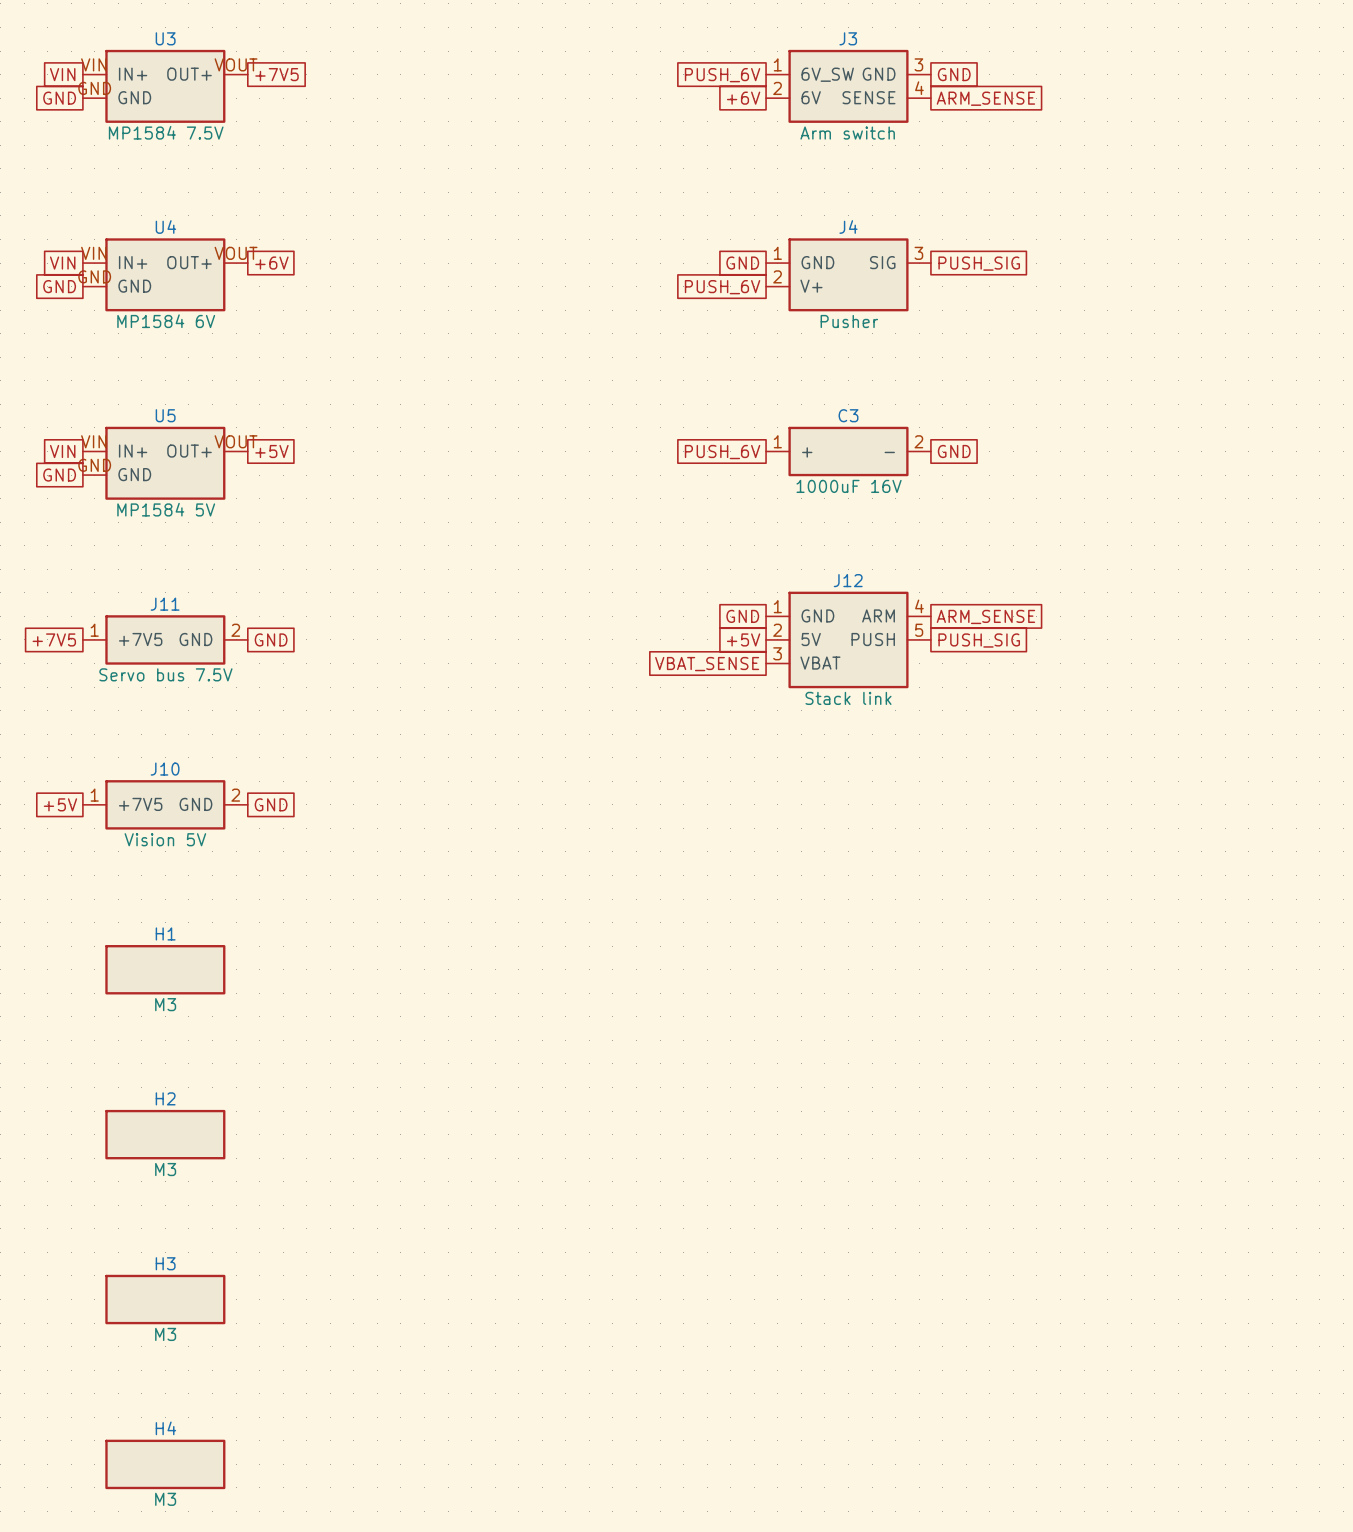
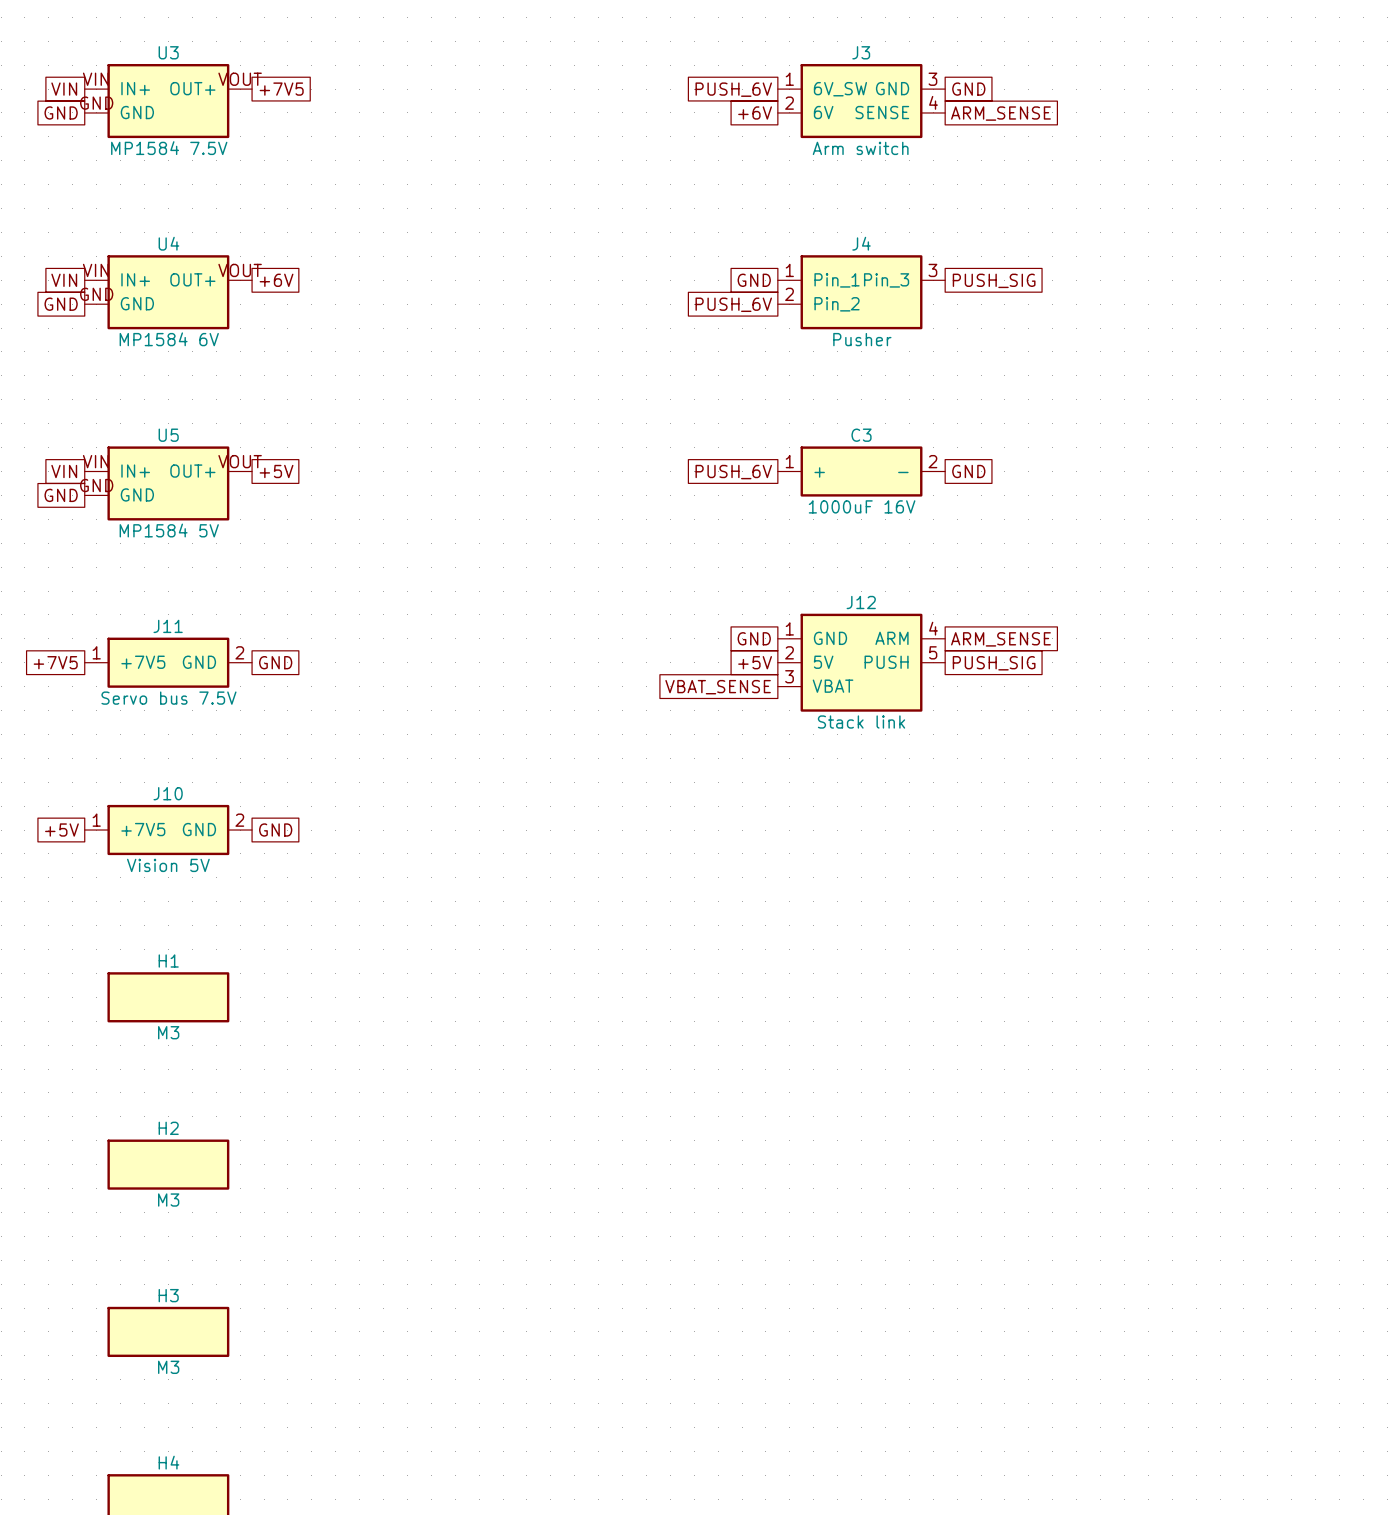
J4 pin name: GND (817, 262) -> Pin_1 (837, 280)
J4 pin name: SIG (882, 262) -> Pin_3 (886, 280)
J4 pin name: V+ (811, 286) -> Pin_2 (837, 304)

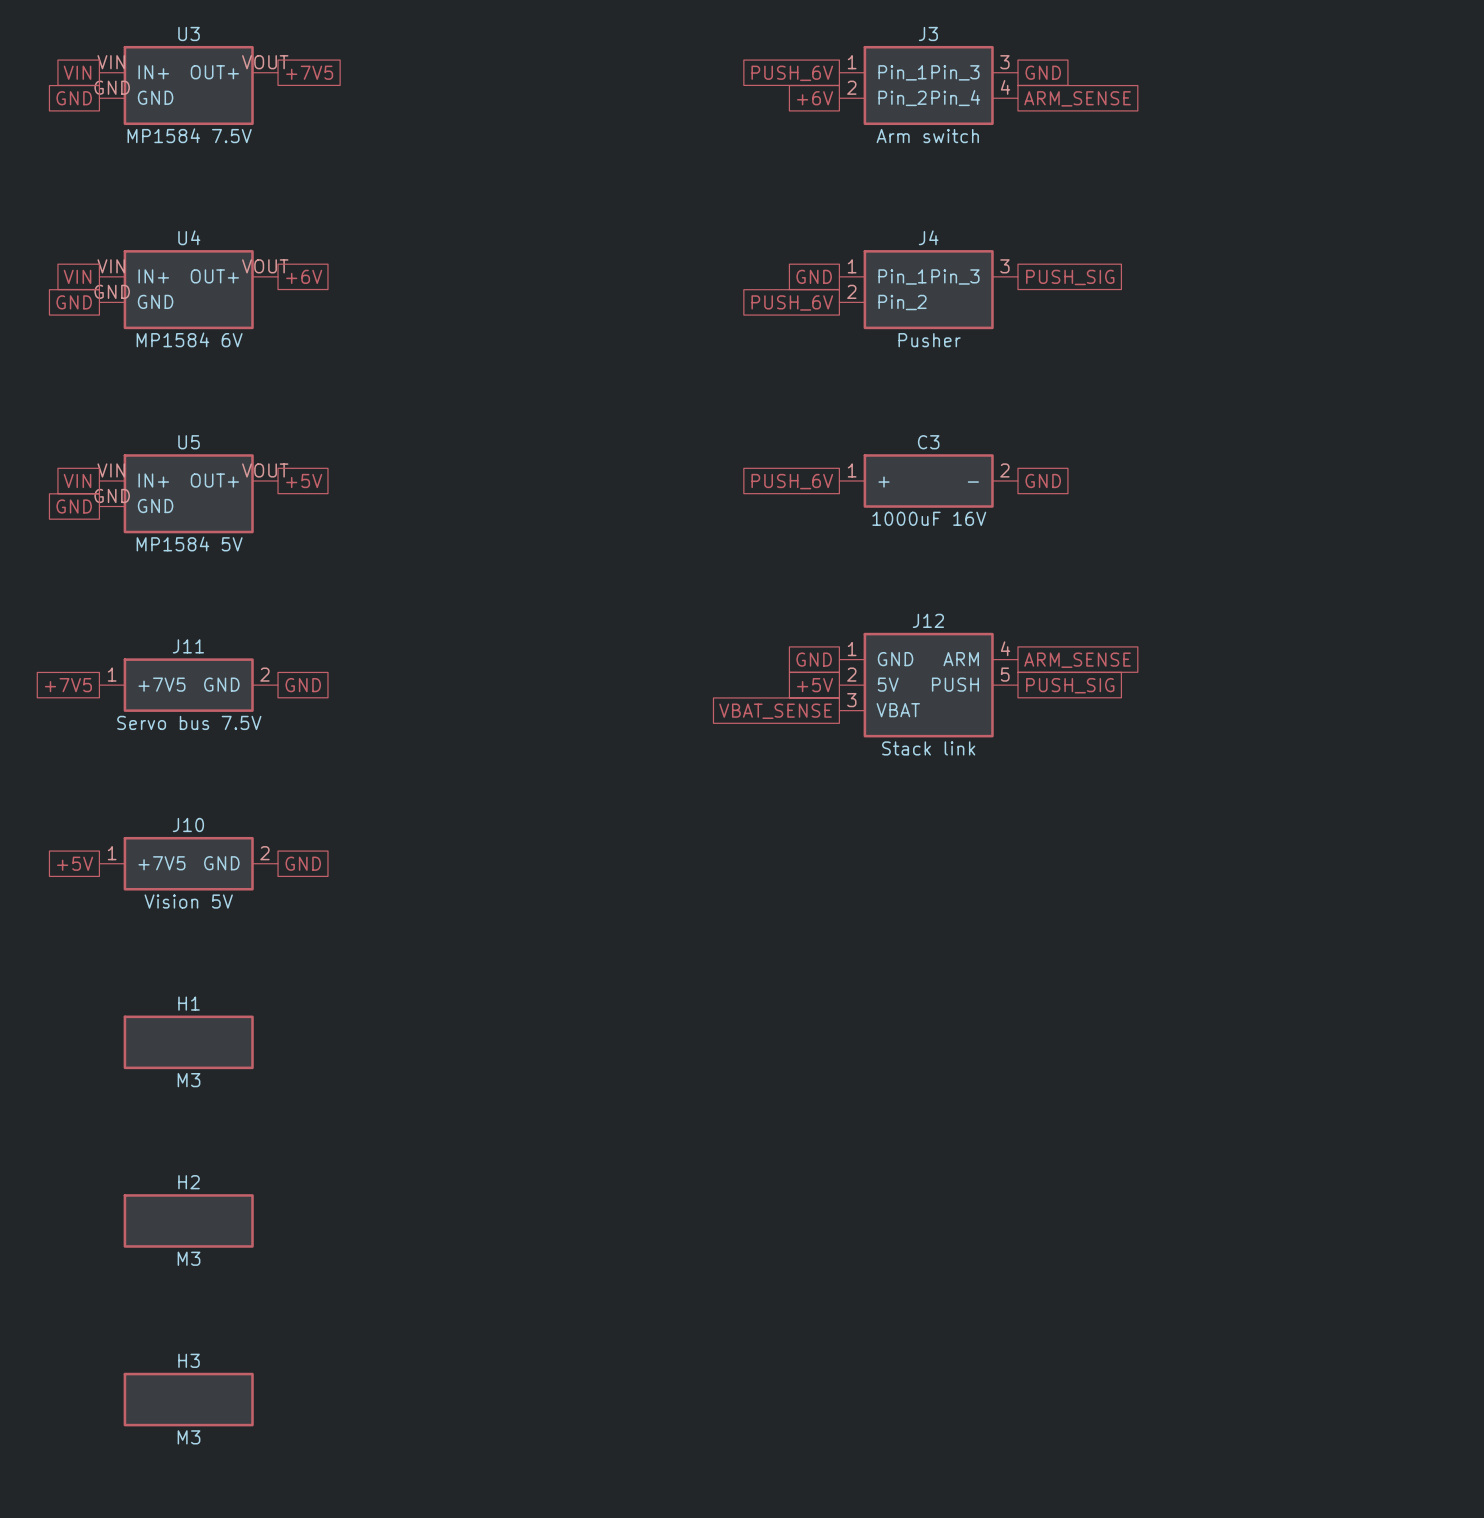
J3 pin name: GND (892, 88) -> Pin_3 (955, 72)
J3 pin name: 6V_SW (840, 89) -> Pin_1 (902, 72)
J3 pin name: 6V (823, 112) -> Pin_2 (902, 98)
J3 pin name: SENSE (882, 112) -> Pin_4 (955, 98)

